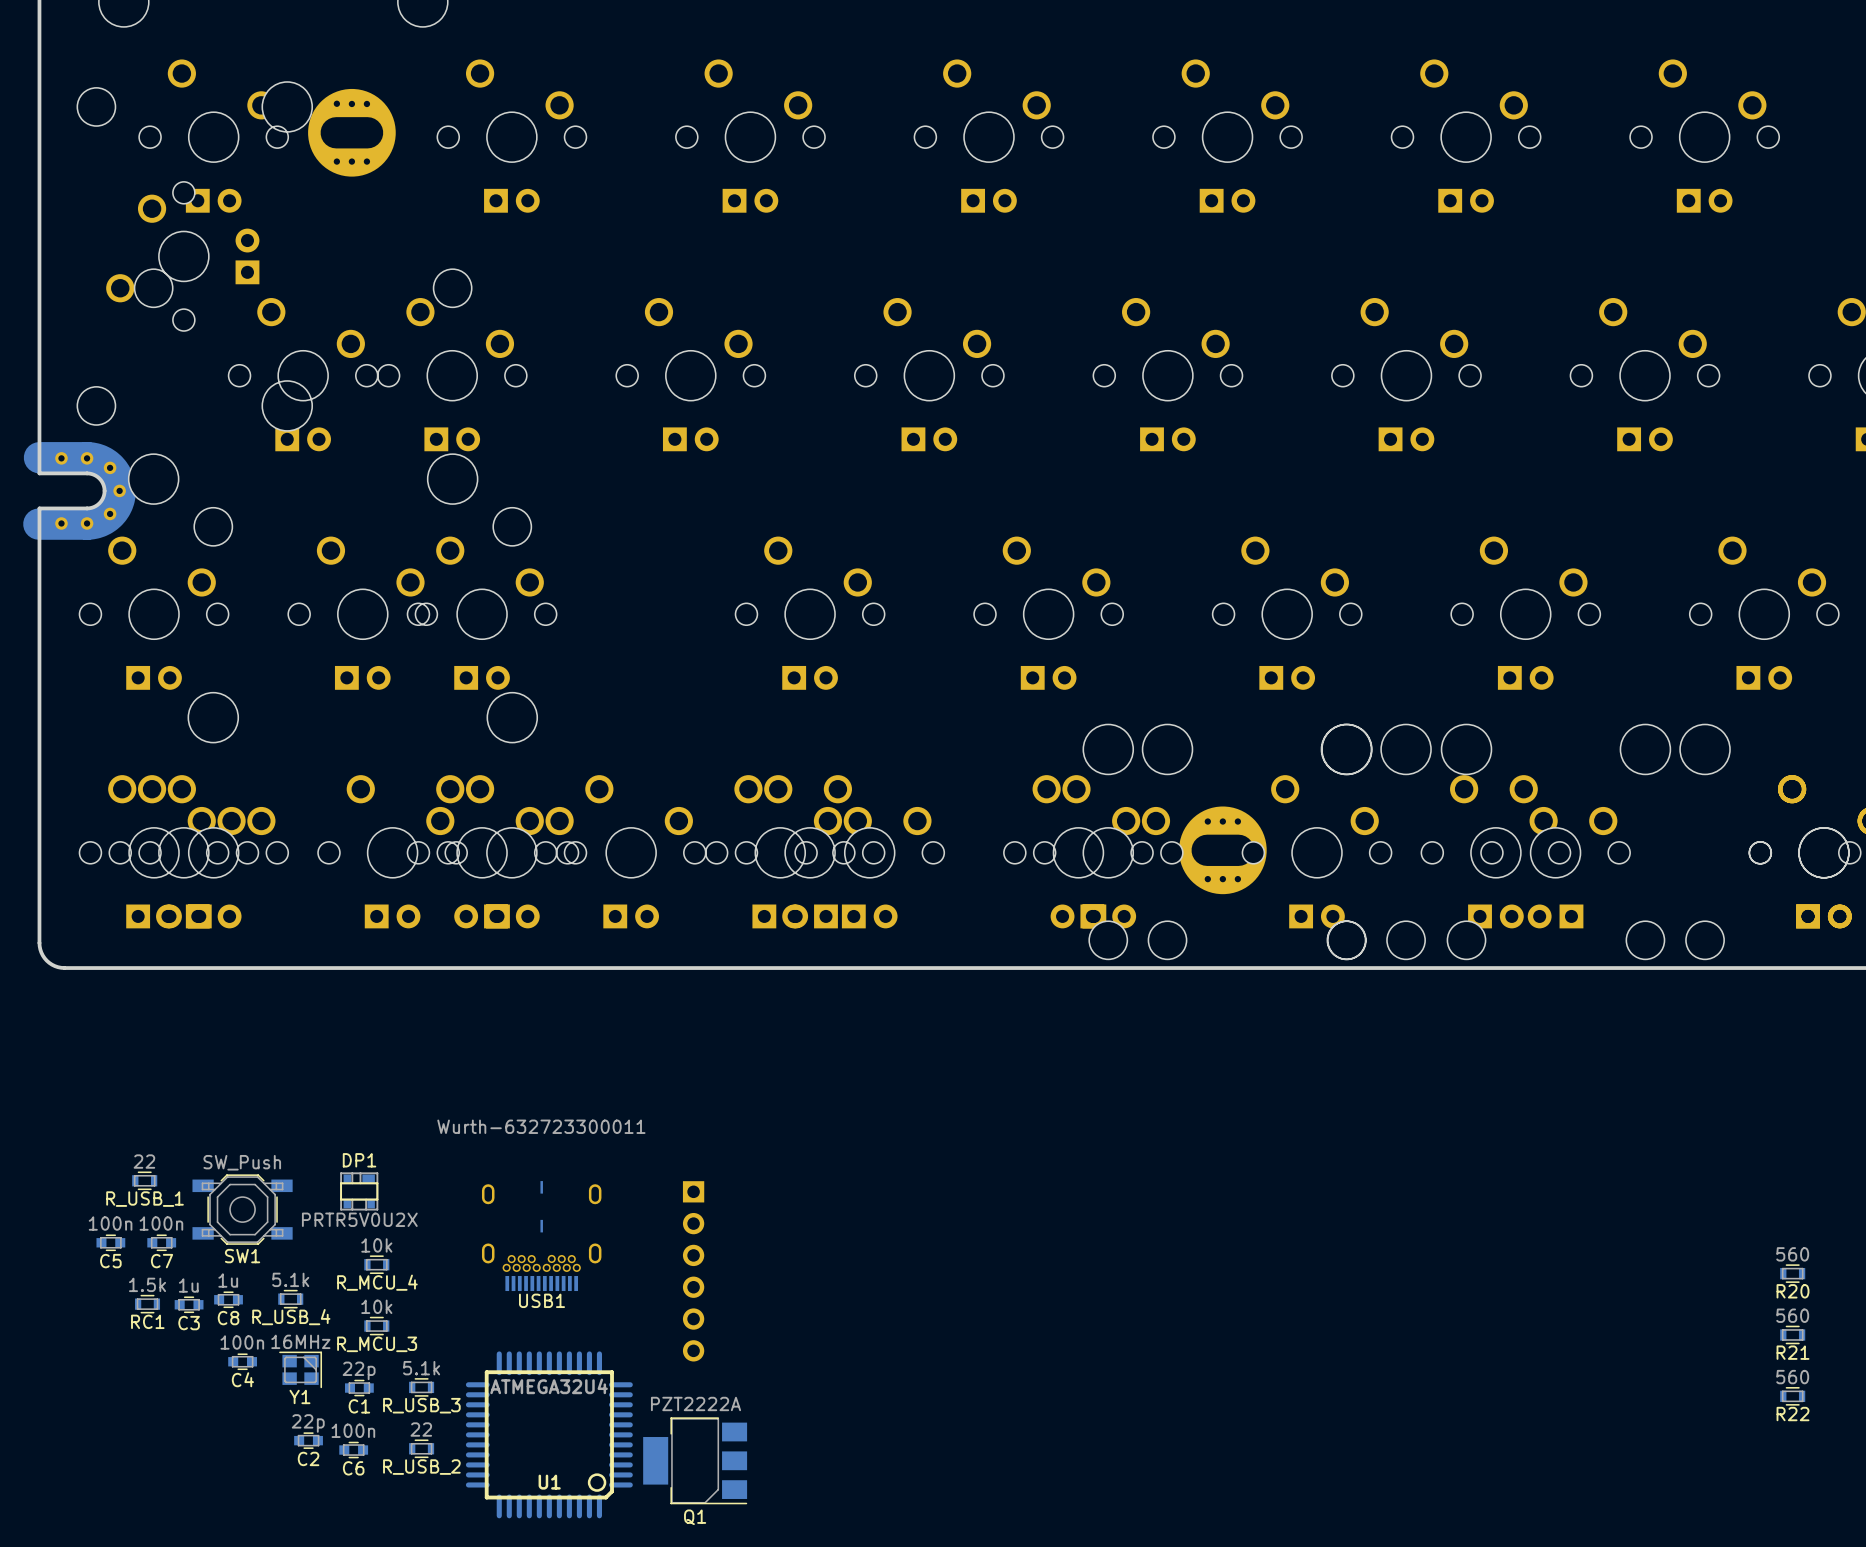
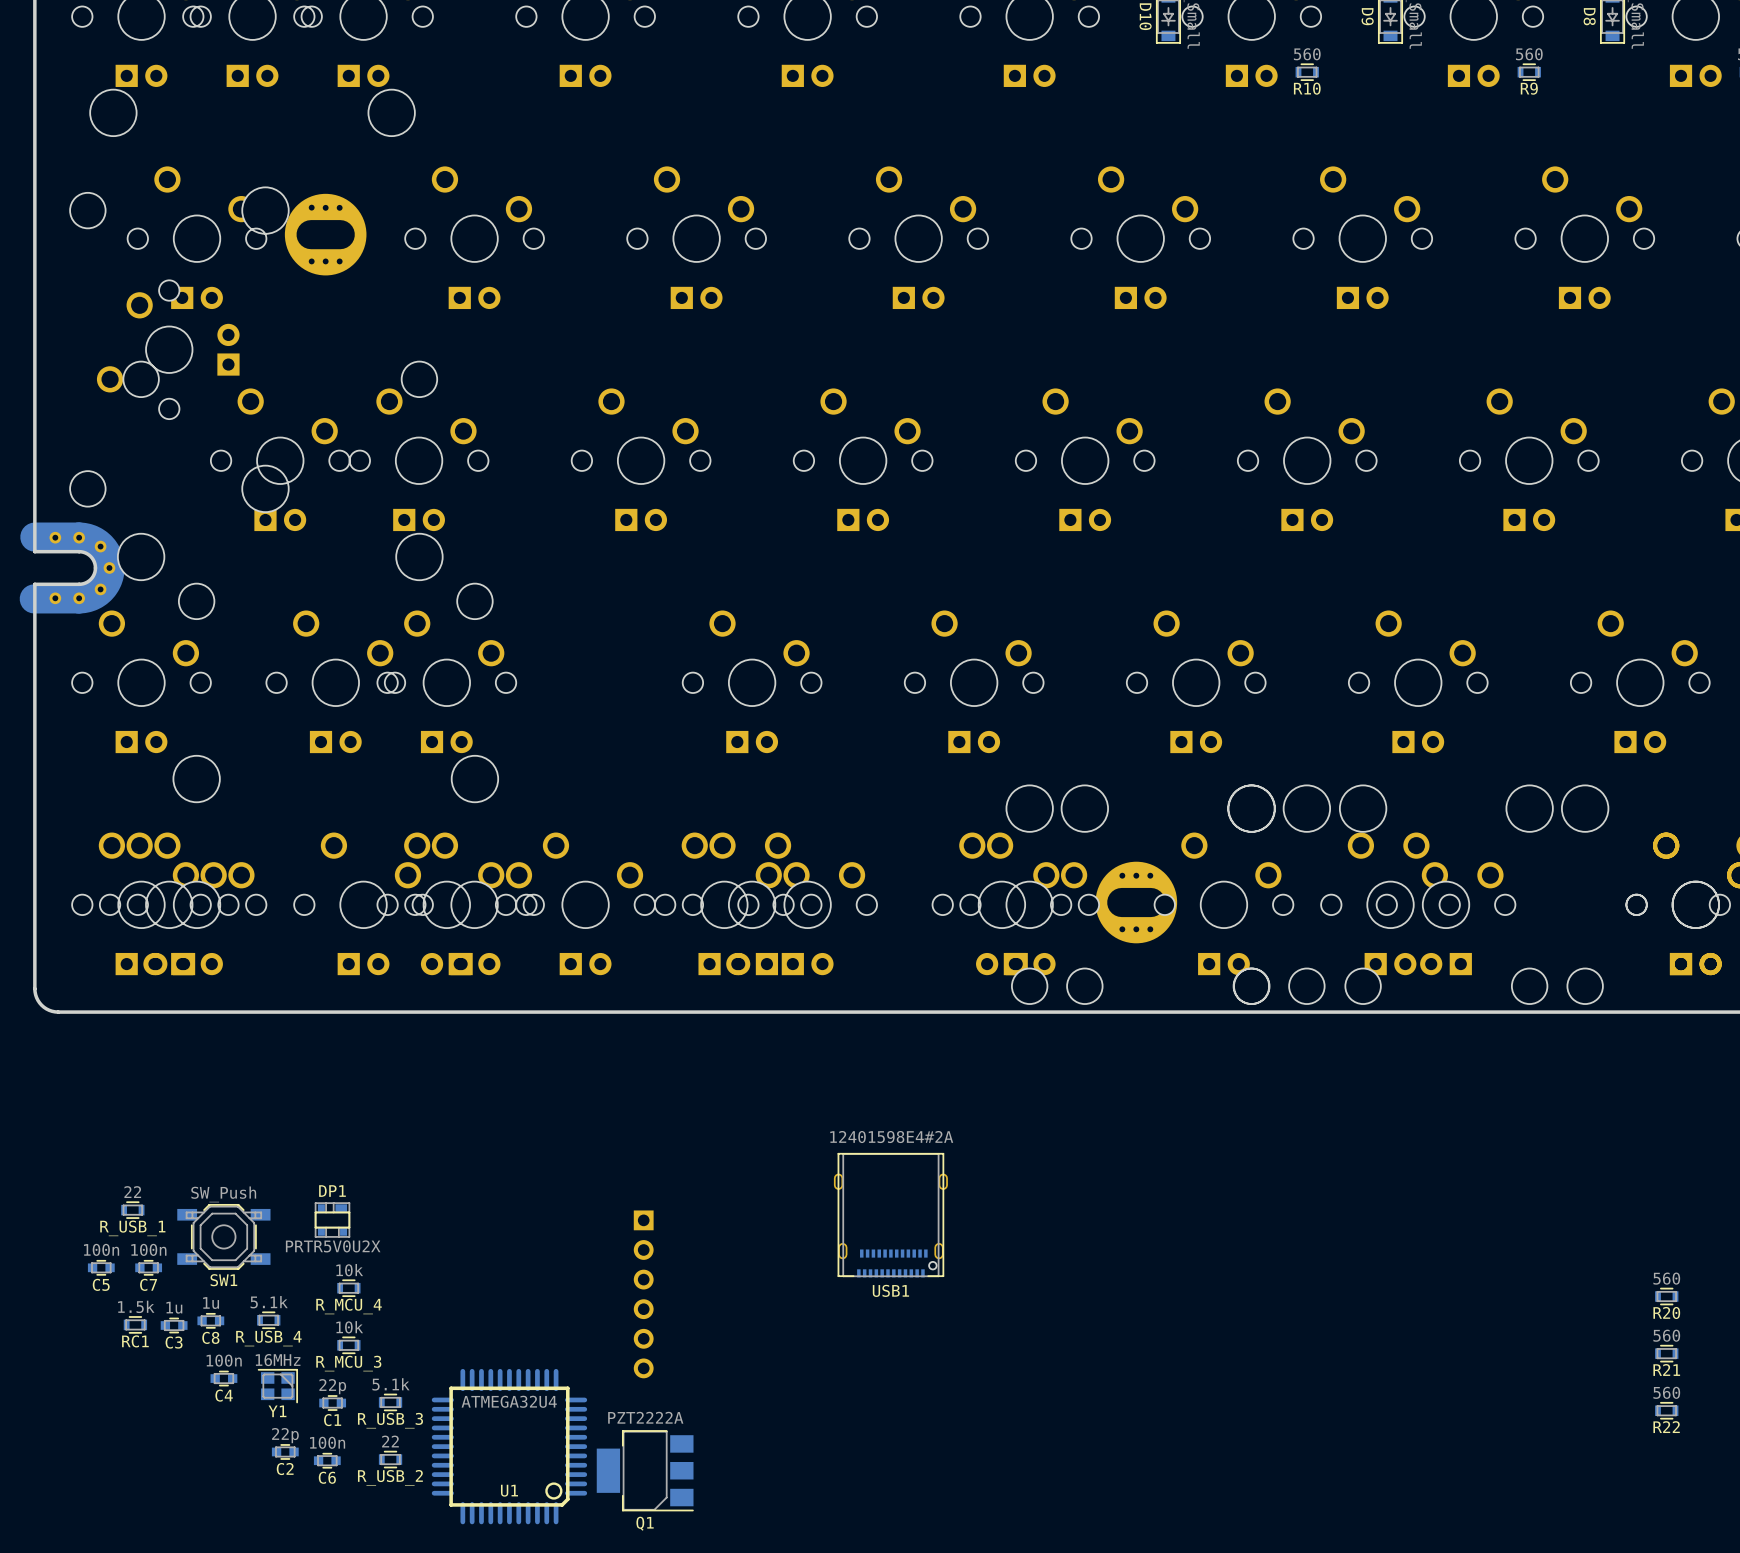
USB1 value: Wurth-632723300011 (541, 1126) -> 12401598E4#2A (891, 1137)
USB1 footprint: [481, 1181, 602, 1292] -> [833, 1152, 948, 1278]

